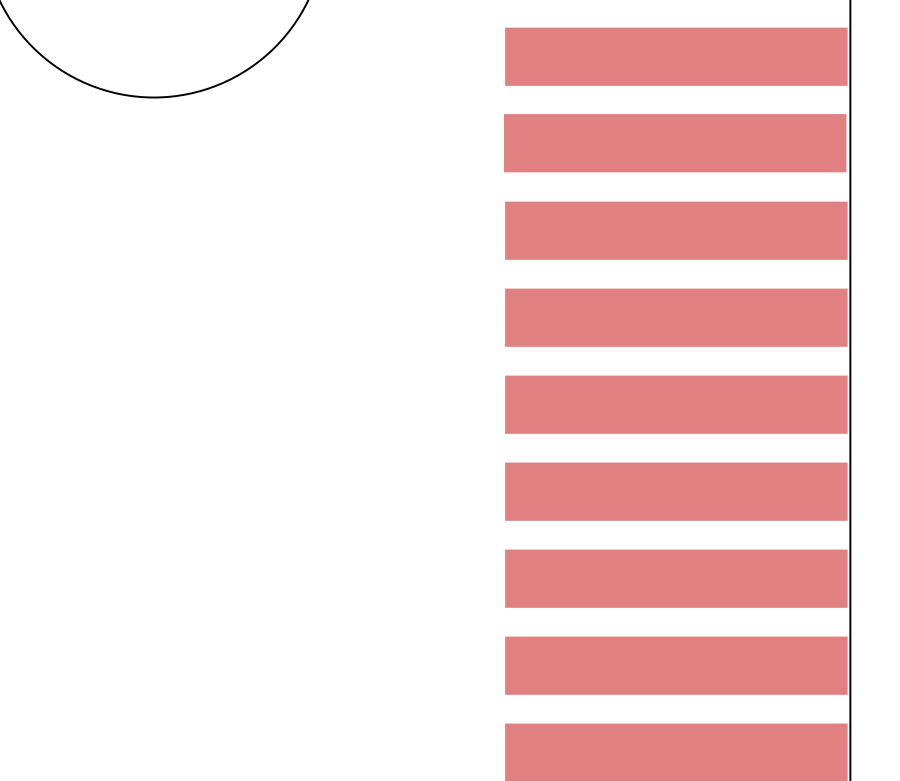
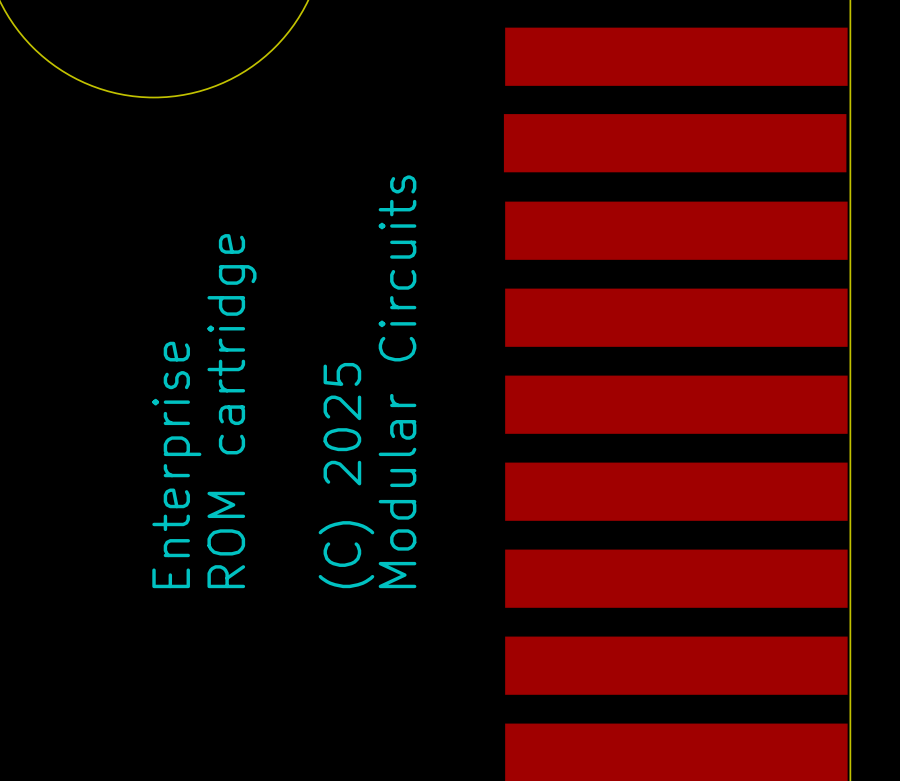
text: none -> Modular Circuits (397, 381)
text: none -> ROM cartridge (231, 411)
text: none -> Enterprise (176, 464)
text: none -> (C) 2025 (346, 475)

